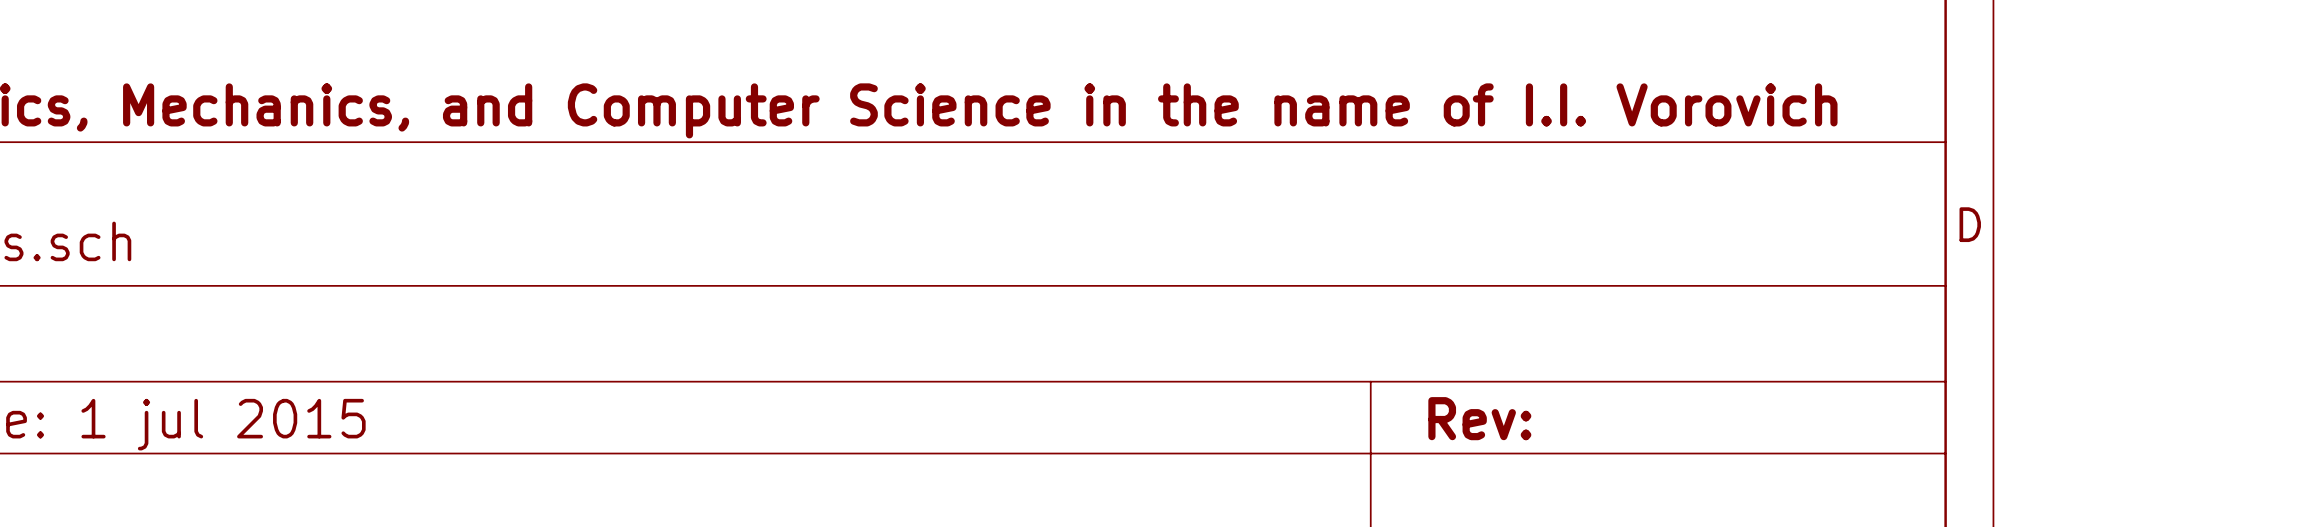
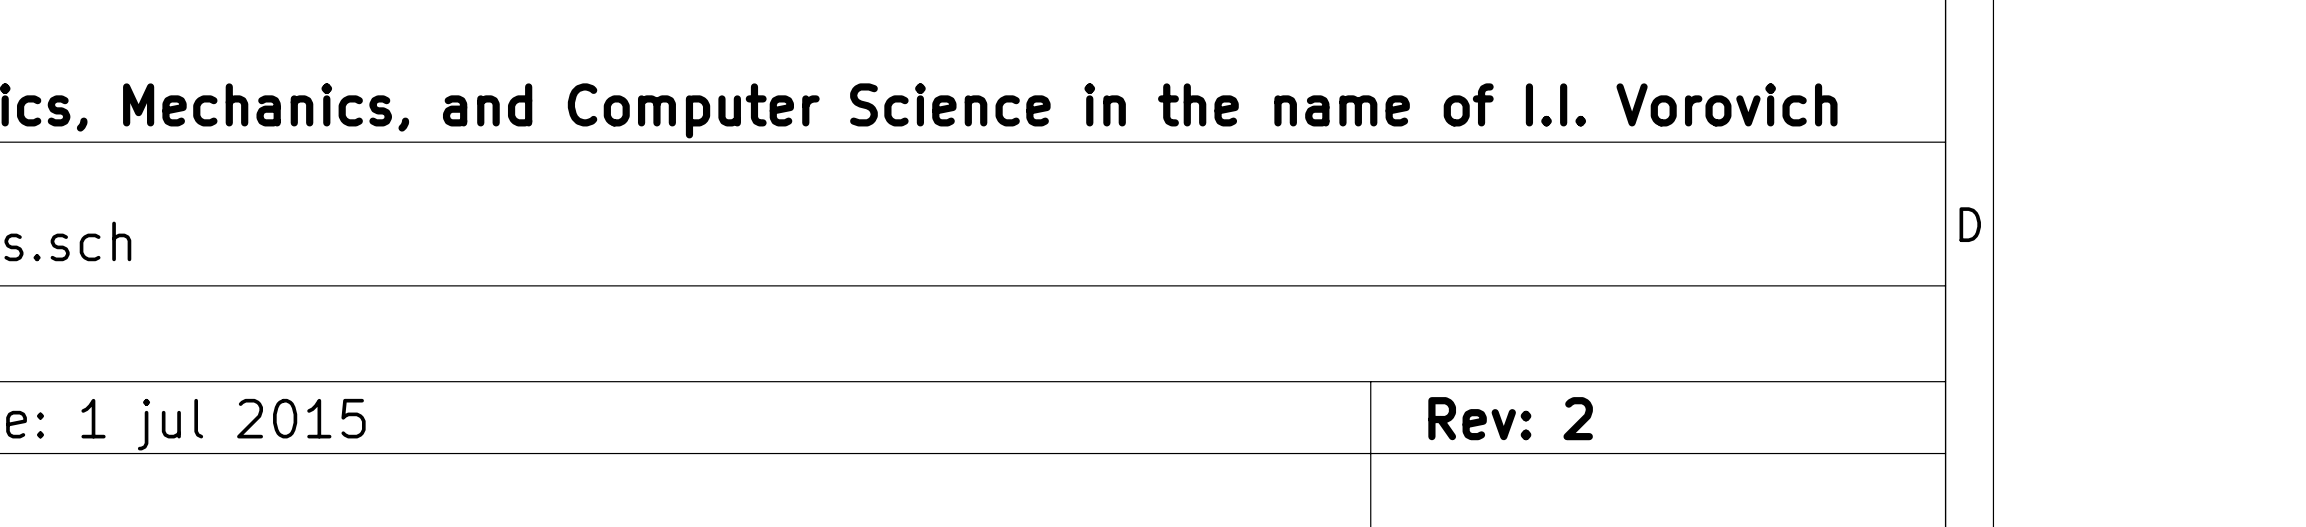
title block: Rev: (1479, 418) -> Rev: 2 (1510, 418)

